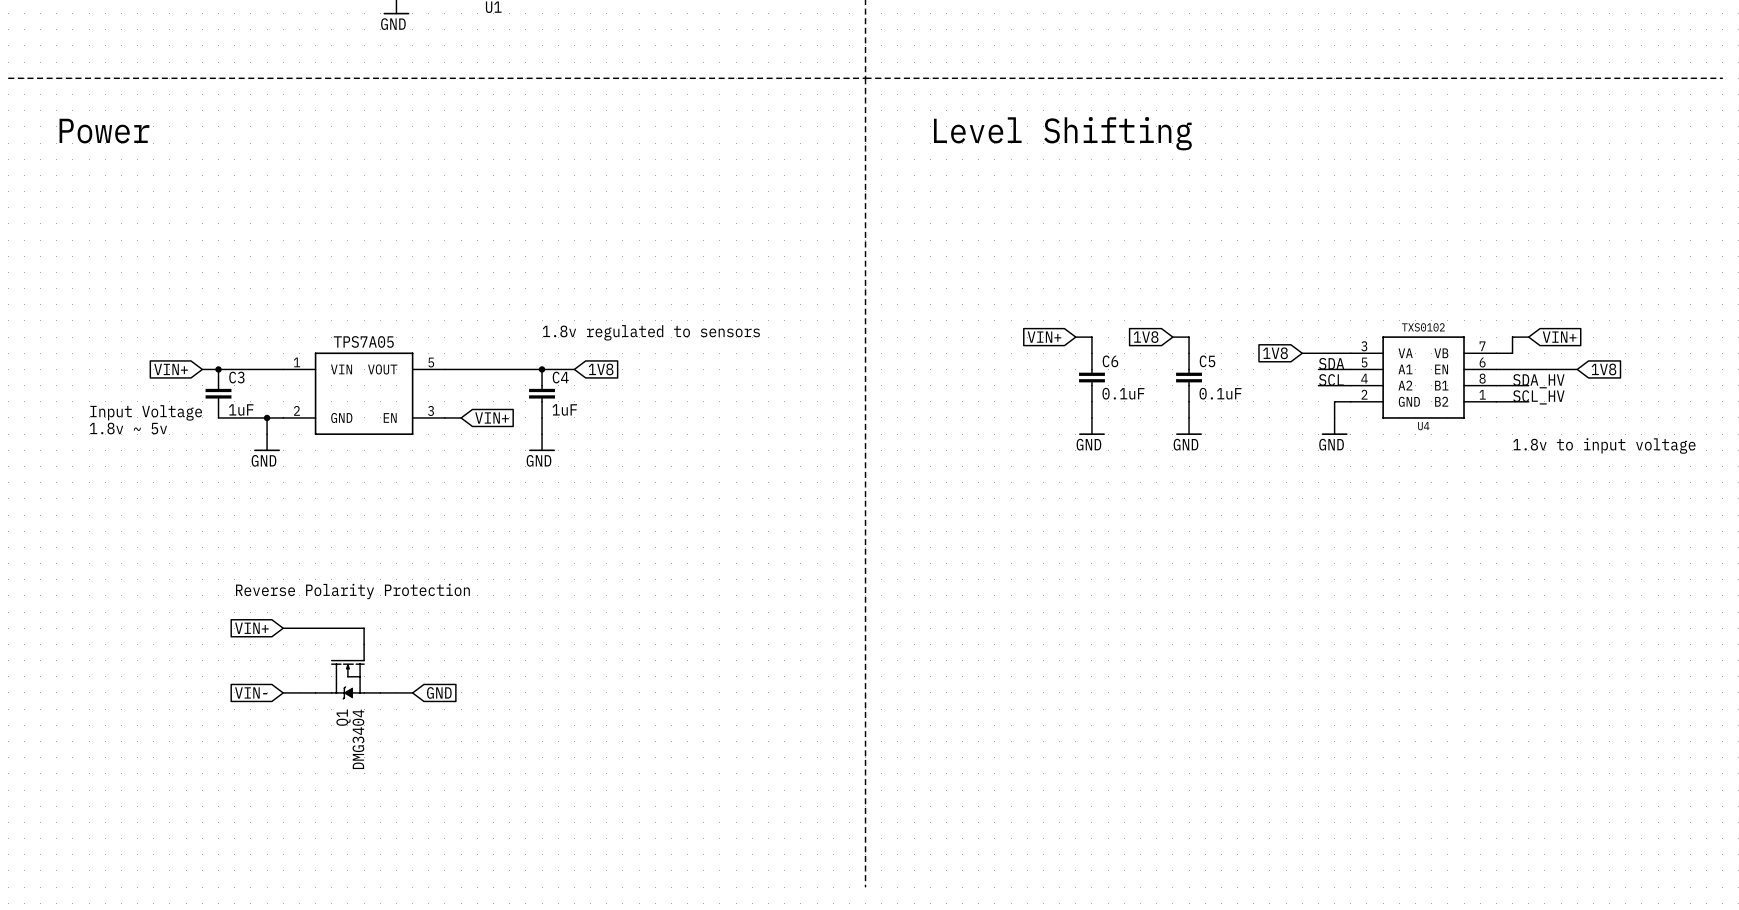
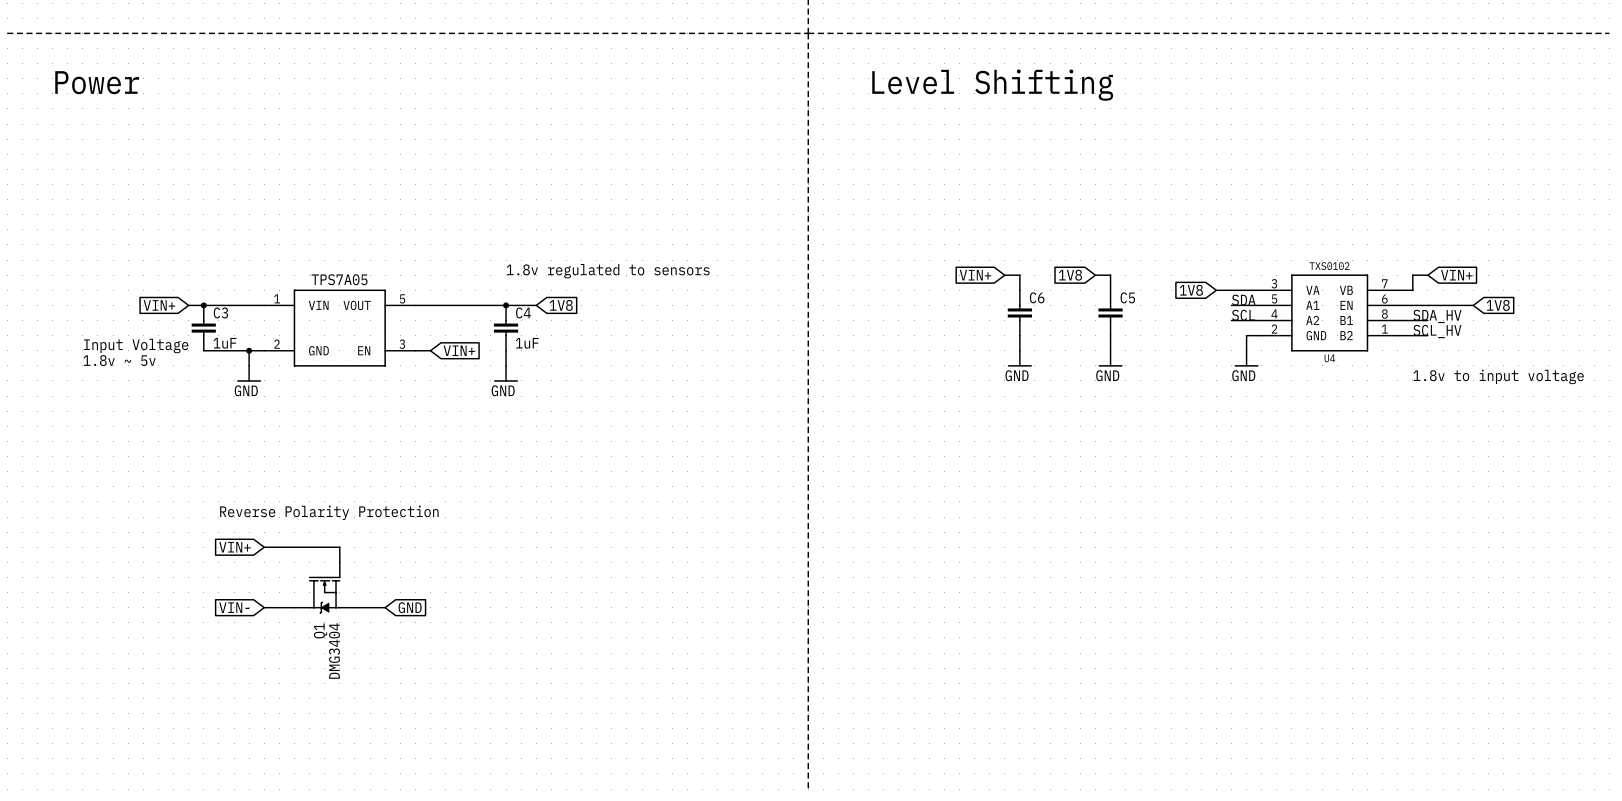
C6 value: 0.1uF (1123, 393) -> none
C5 value: 0.1uF (1220, 393) -> none

